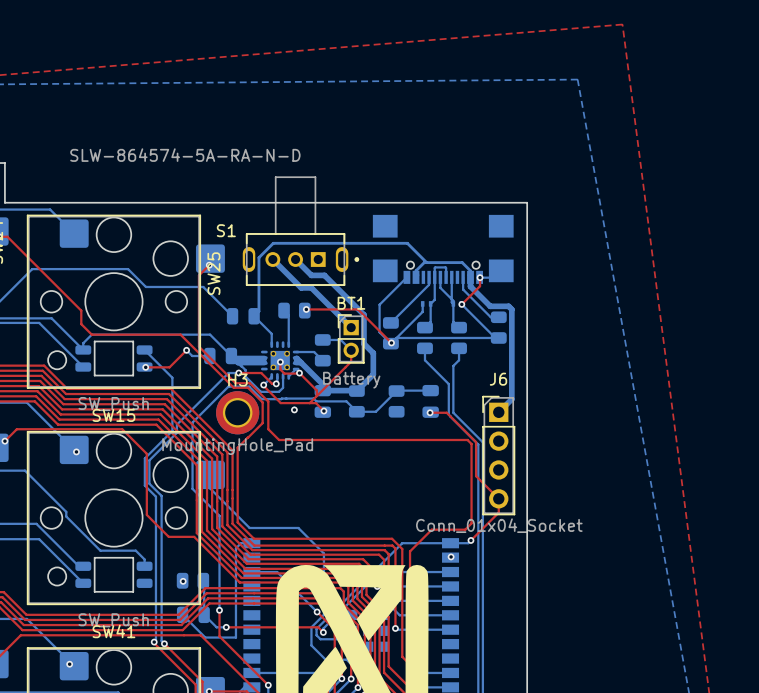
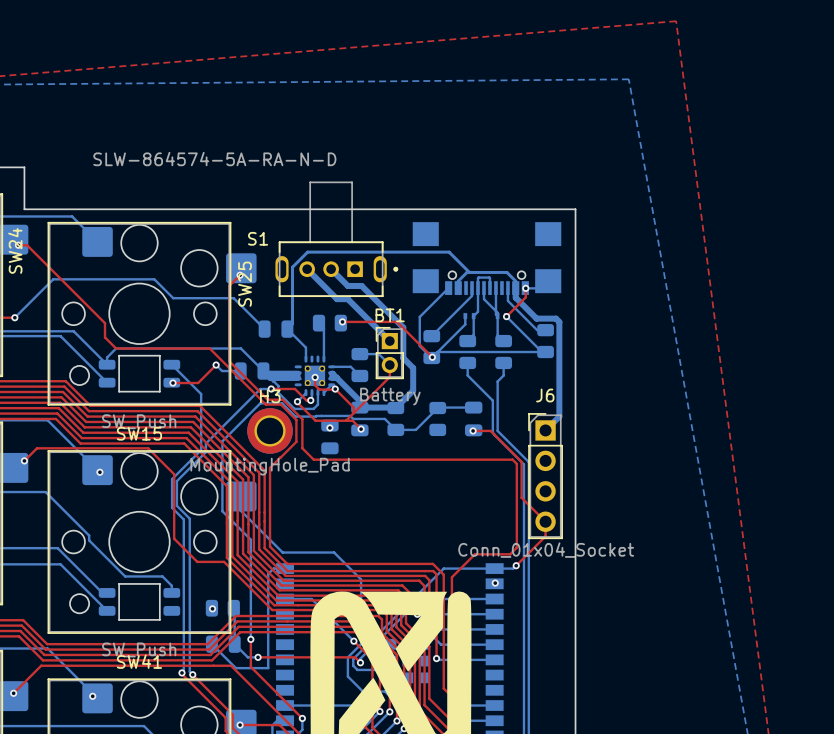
part: none -> (329, 436)

